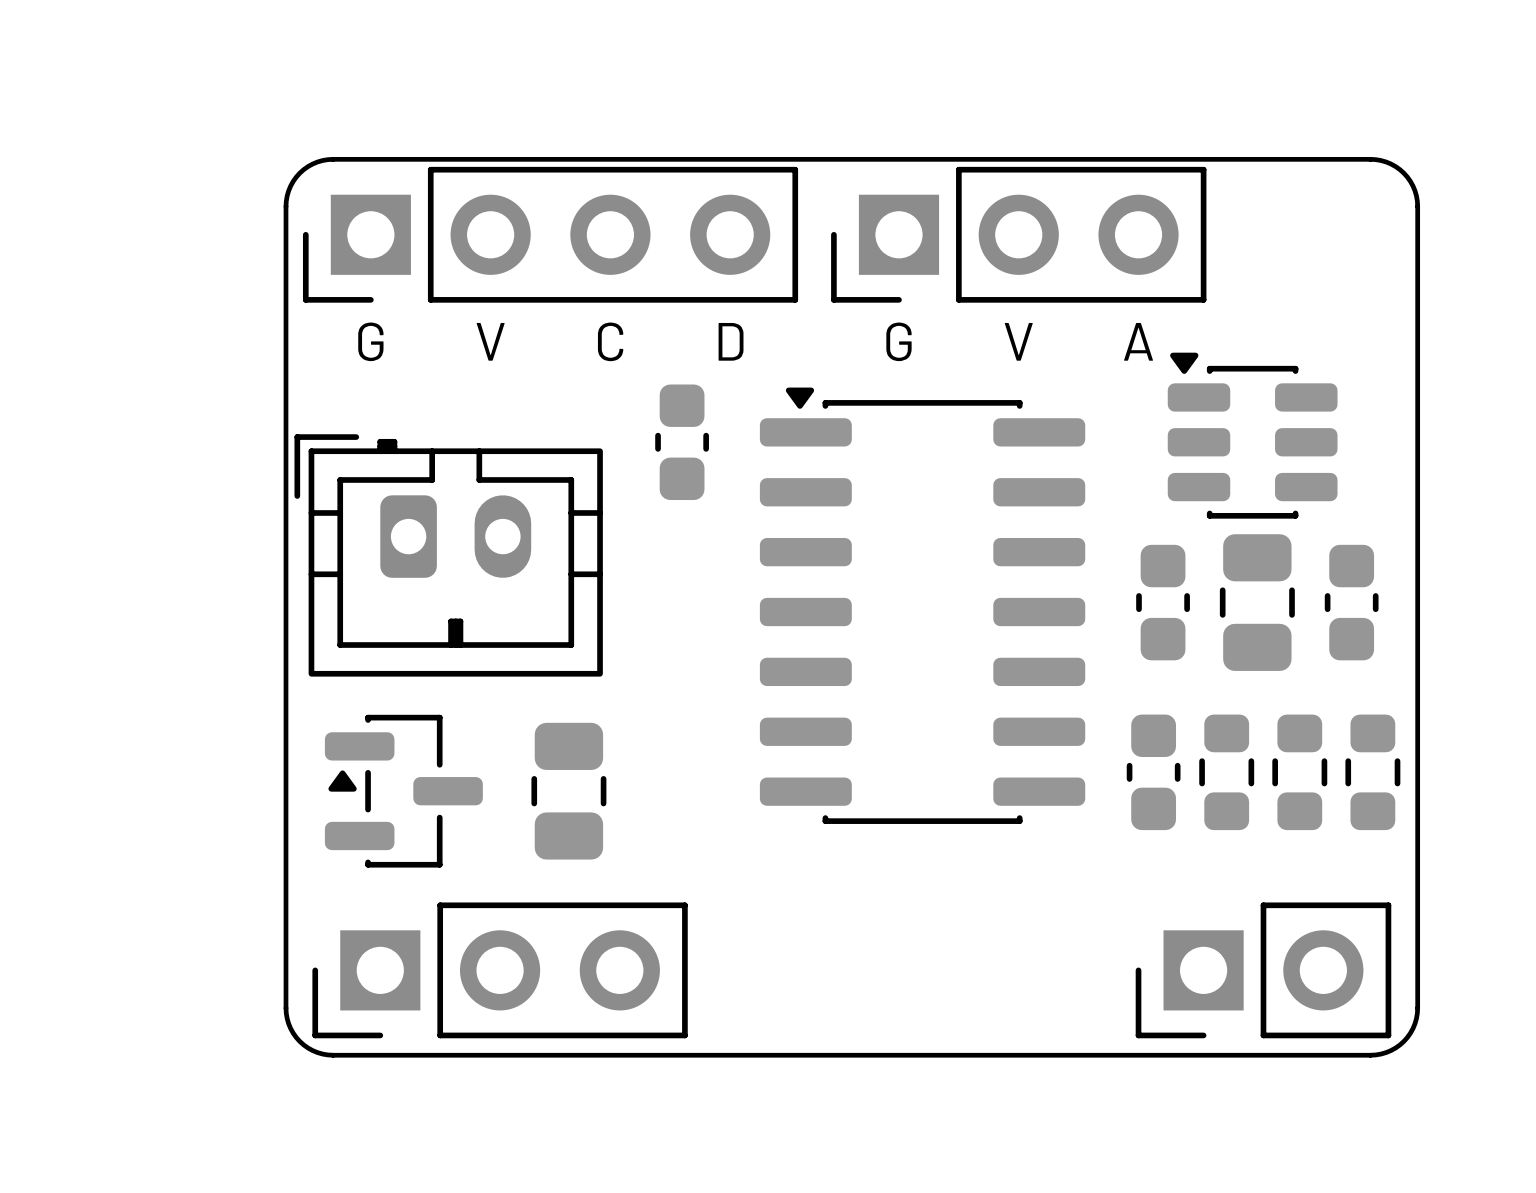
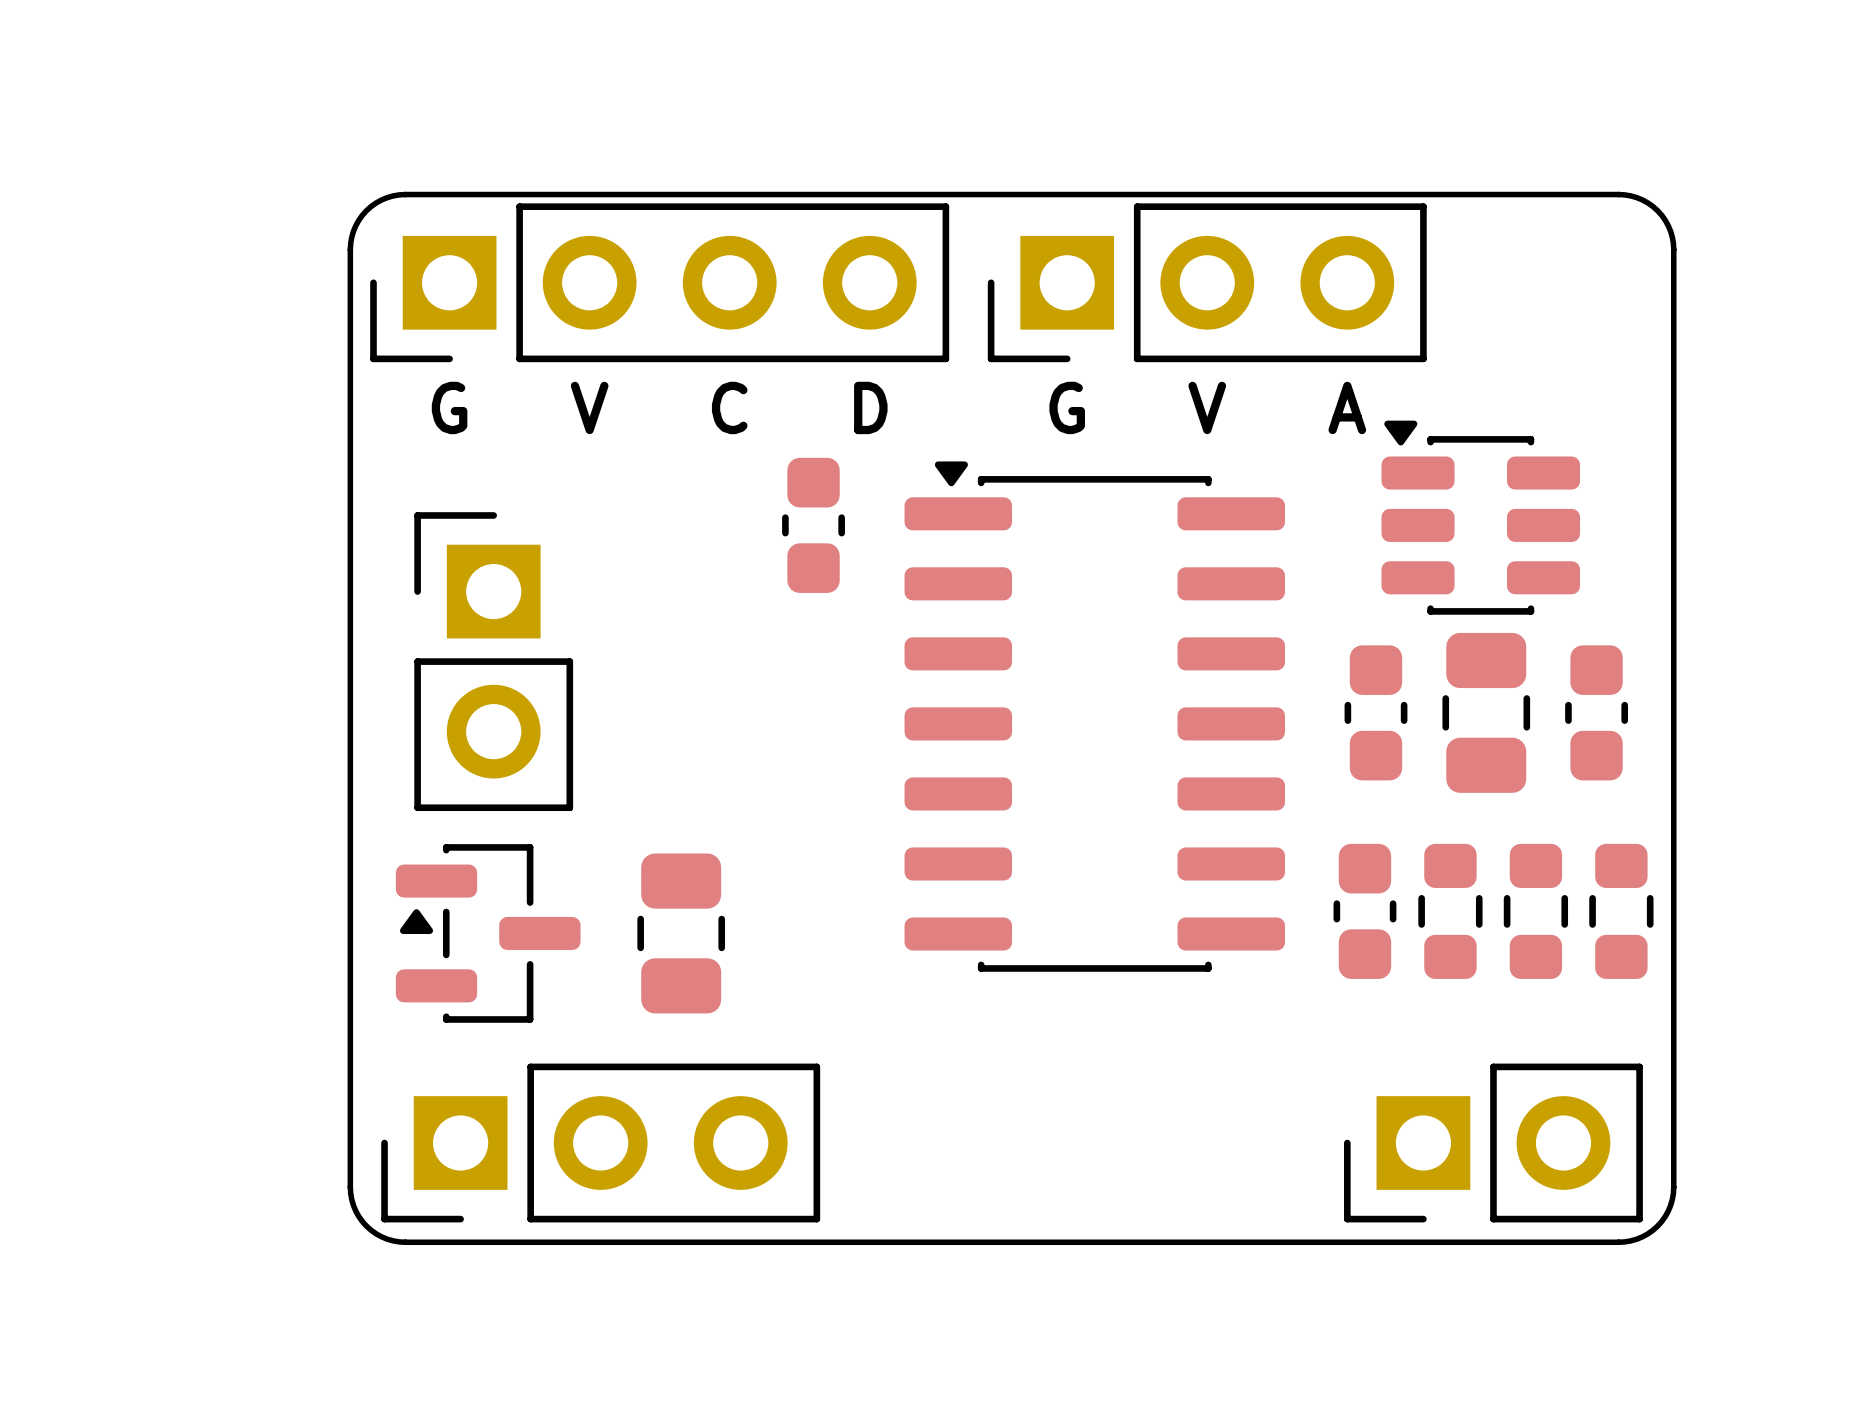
part footprint: [294, 434, 603, 677] -> [414, 512, 574, 812]

